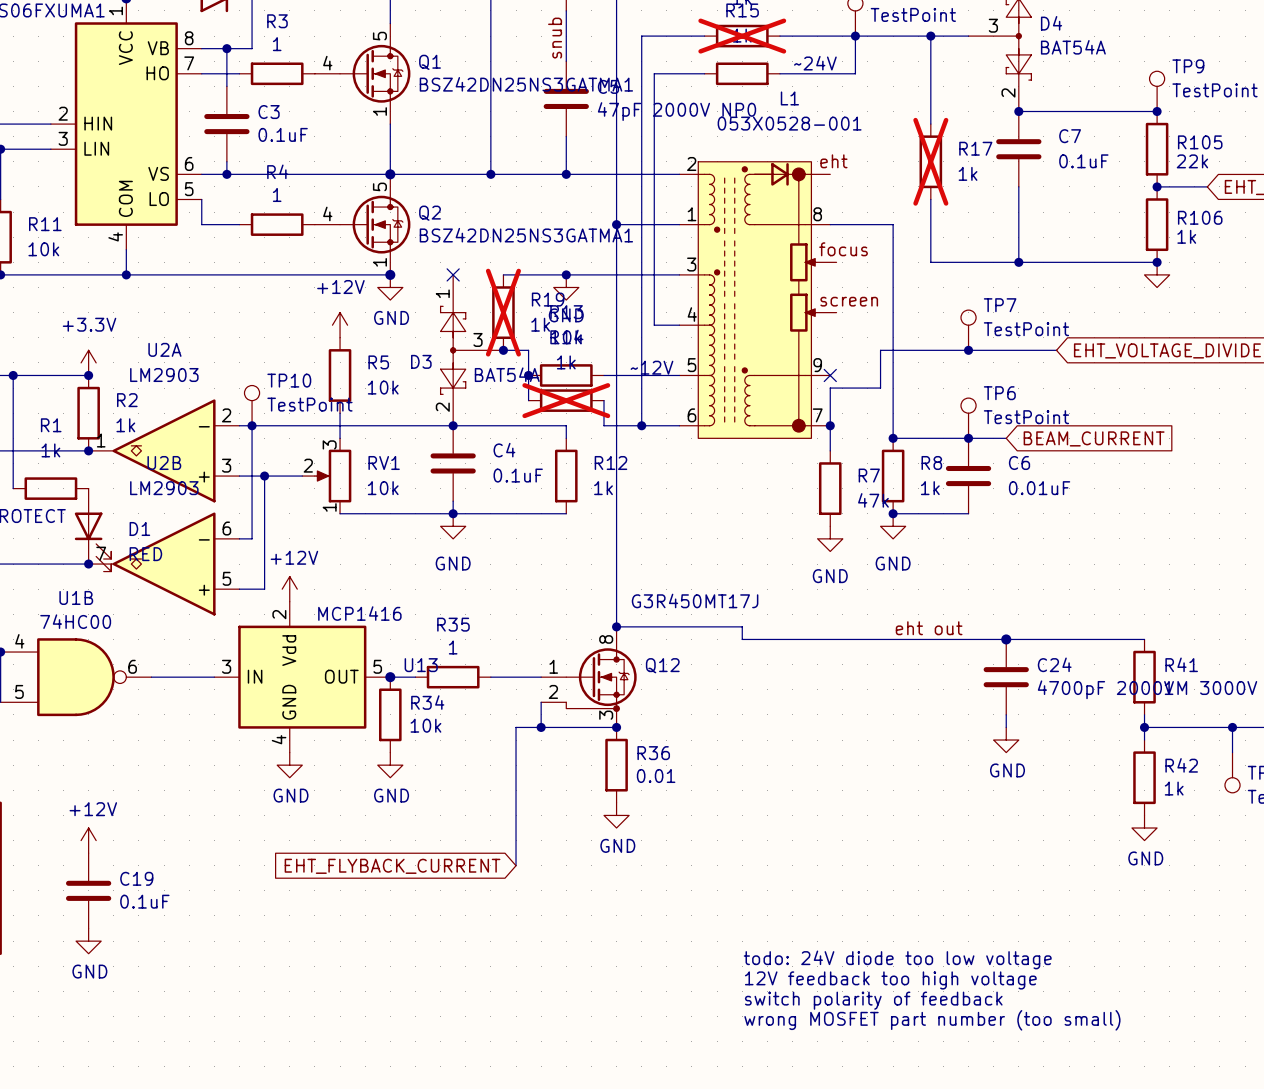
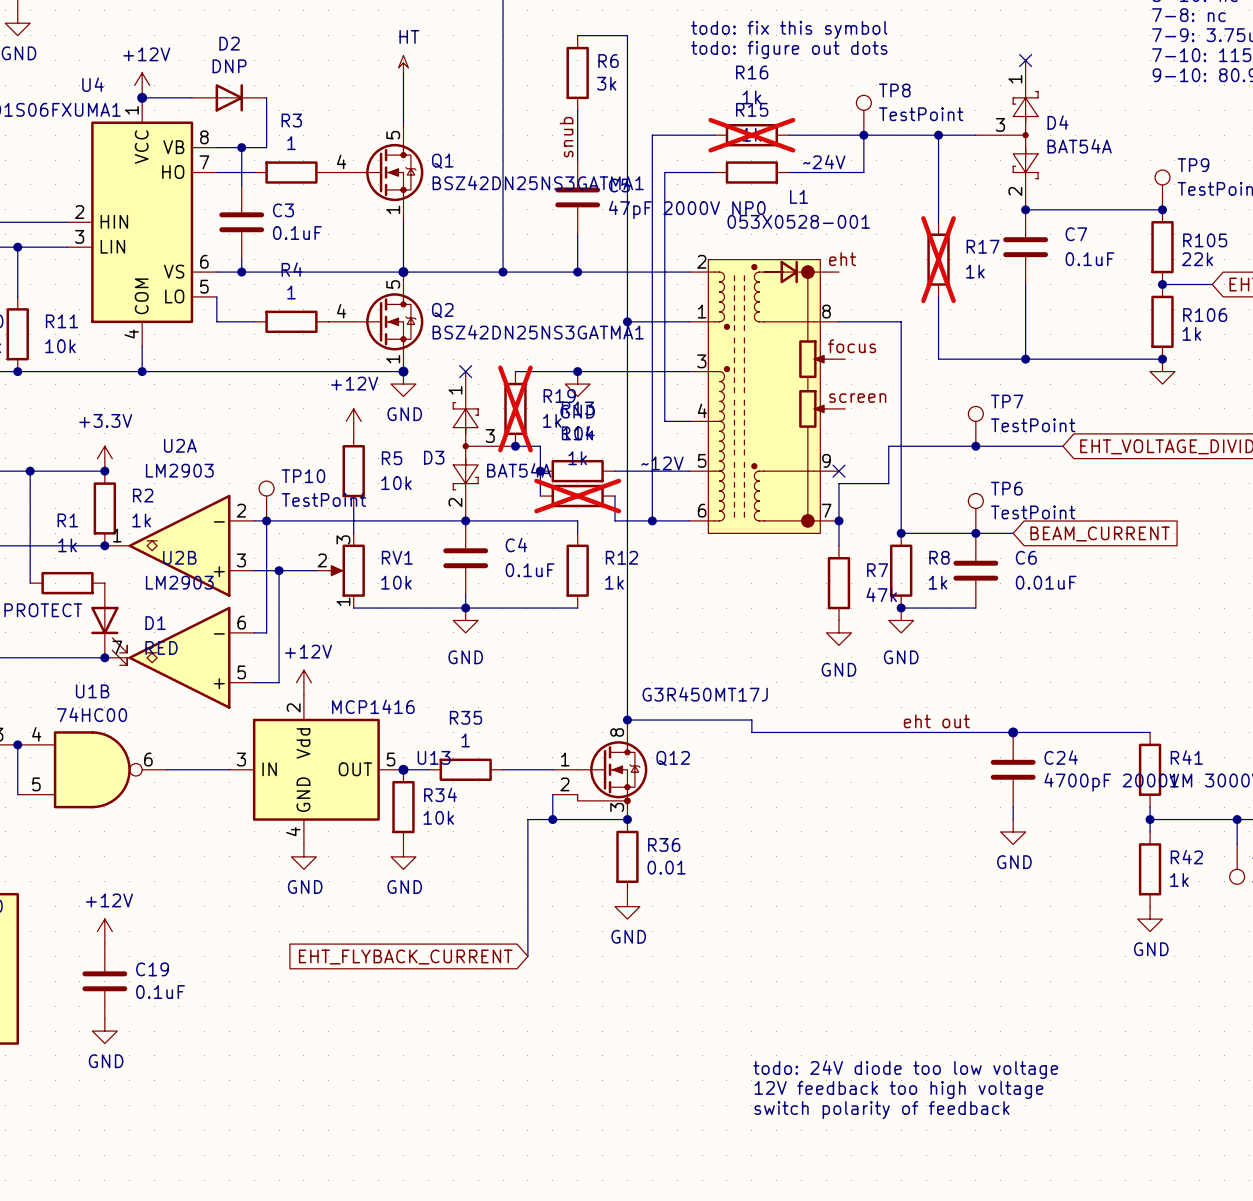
text: todo: 24V diode too low voltage (897, 959) -> none
text: 12V feedback too high voltage (890, 980) -> todo: 24V diode too low voltage (905, 1069)
text: switch polarity of feedback (873, 1000) -> 12V feedback too high voltage (898, 1090)
text: wrong MOSFET part number (too small) (932, 1020) -> switch polarity of feedback (882, 1110)

